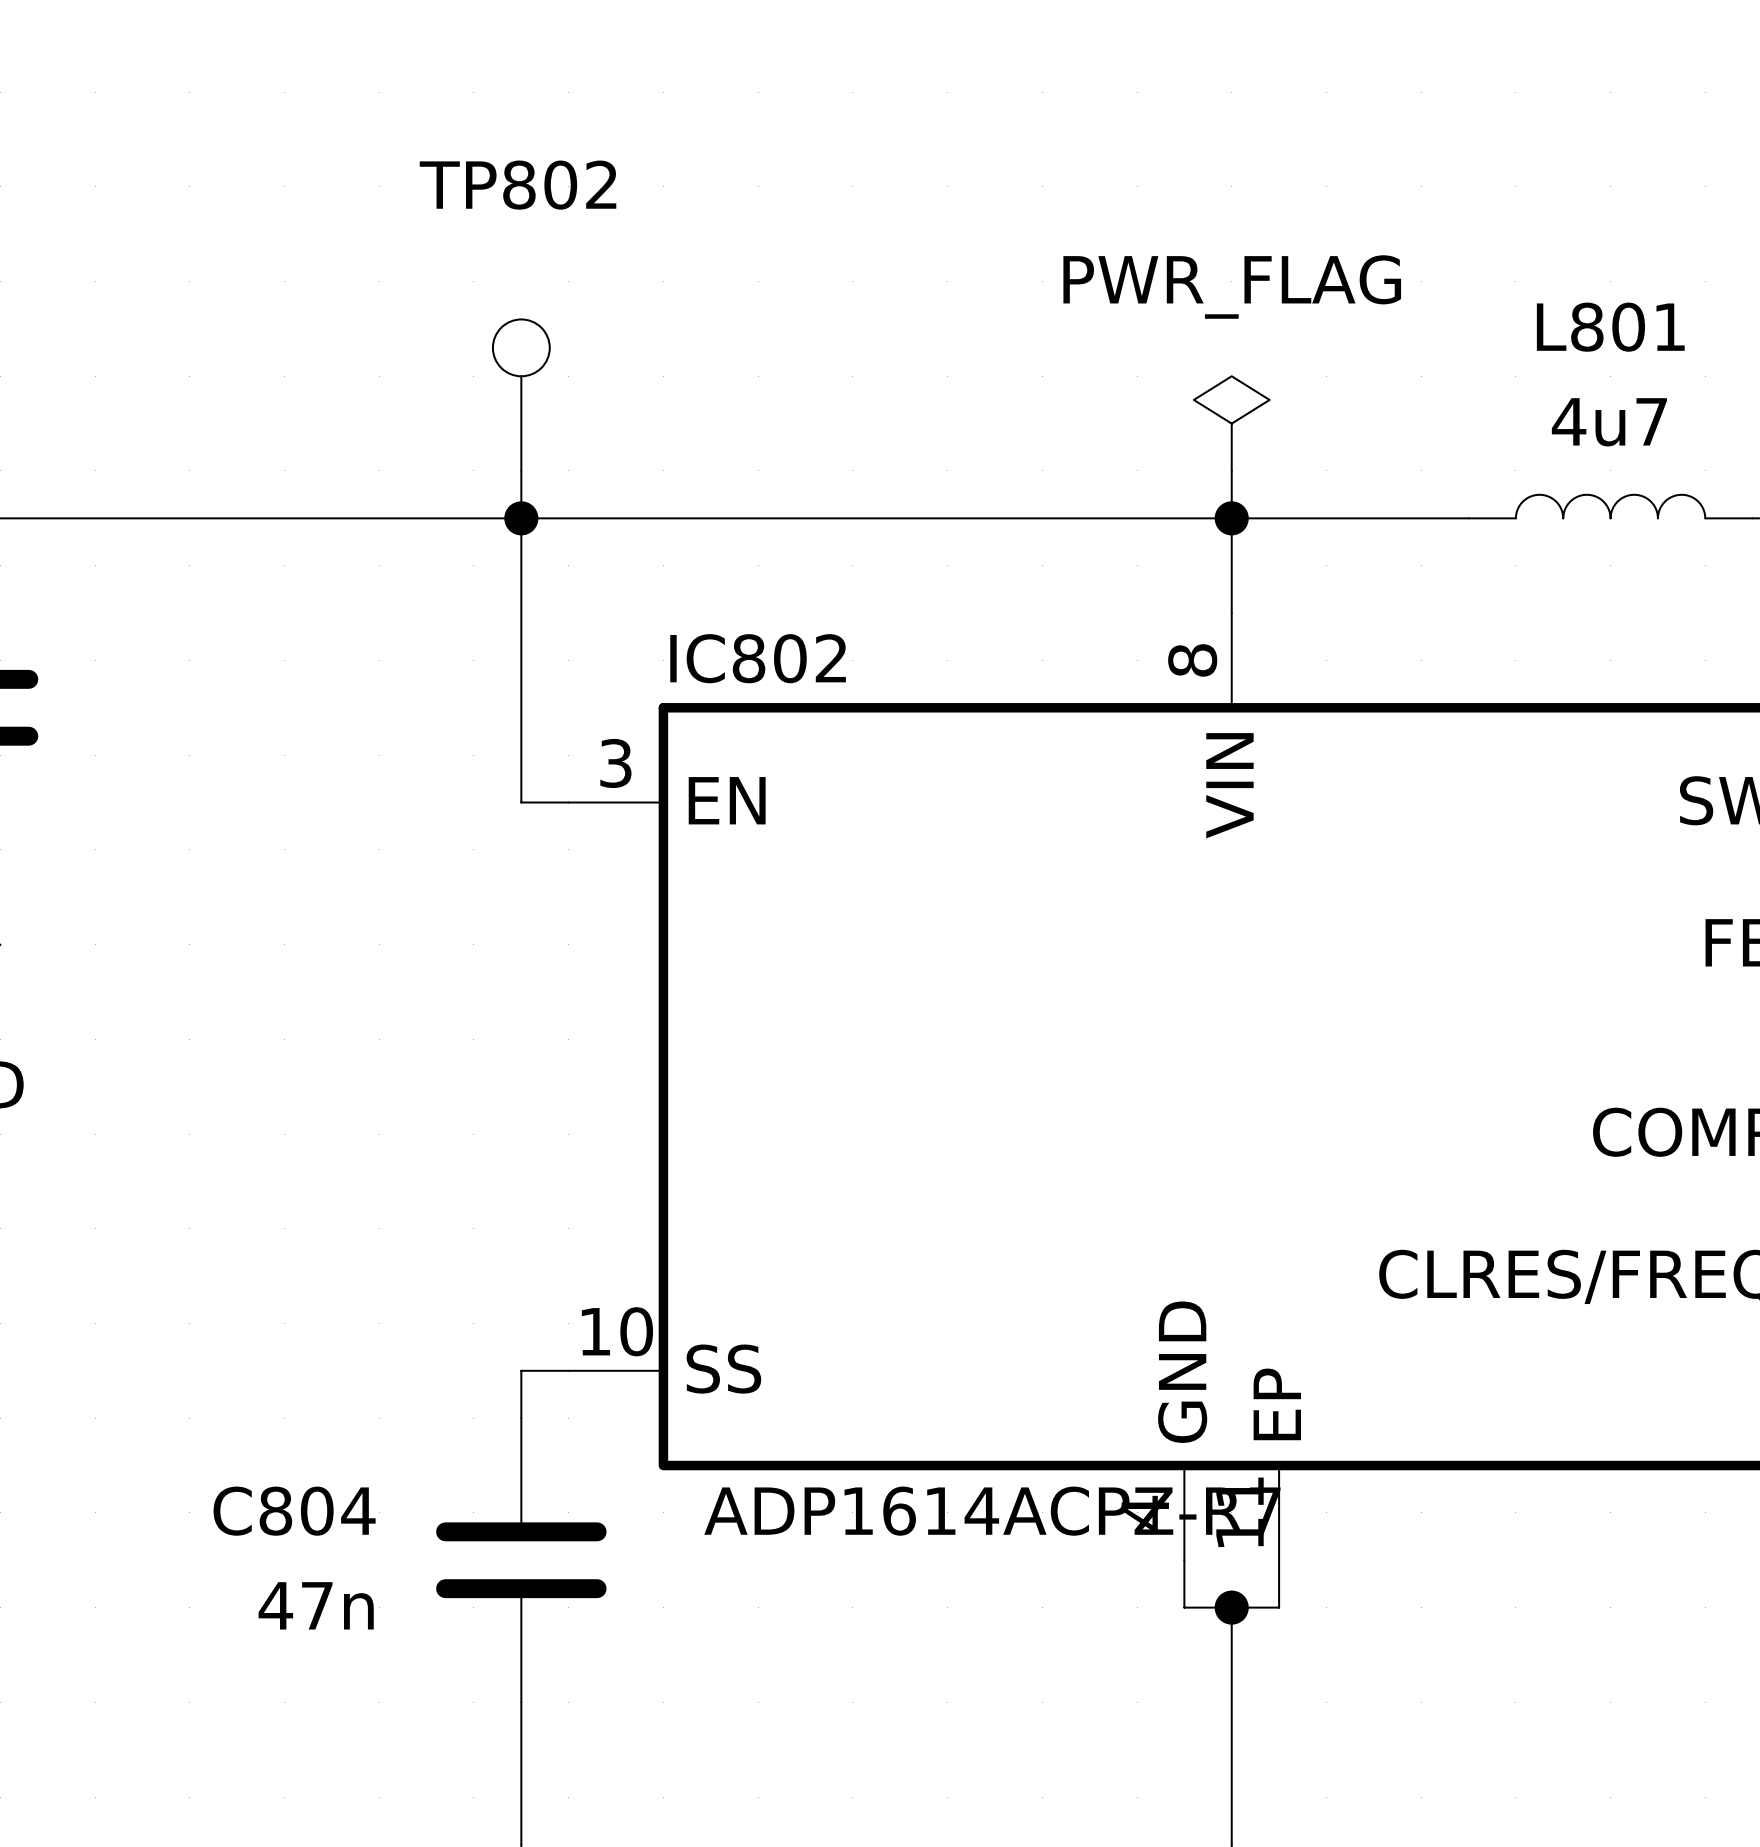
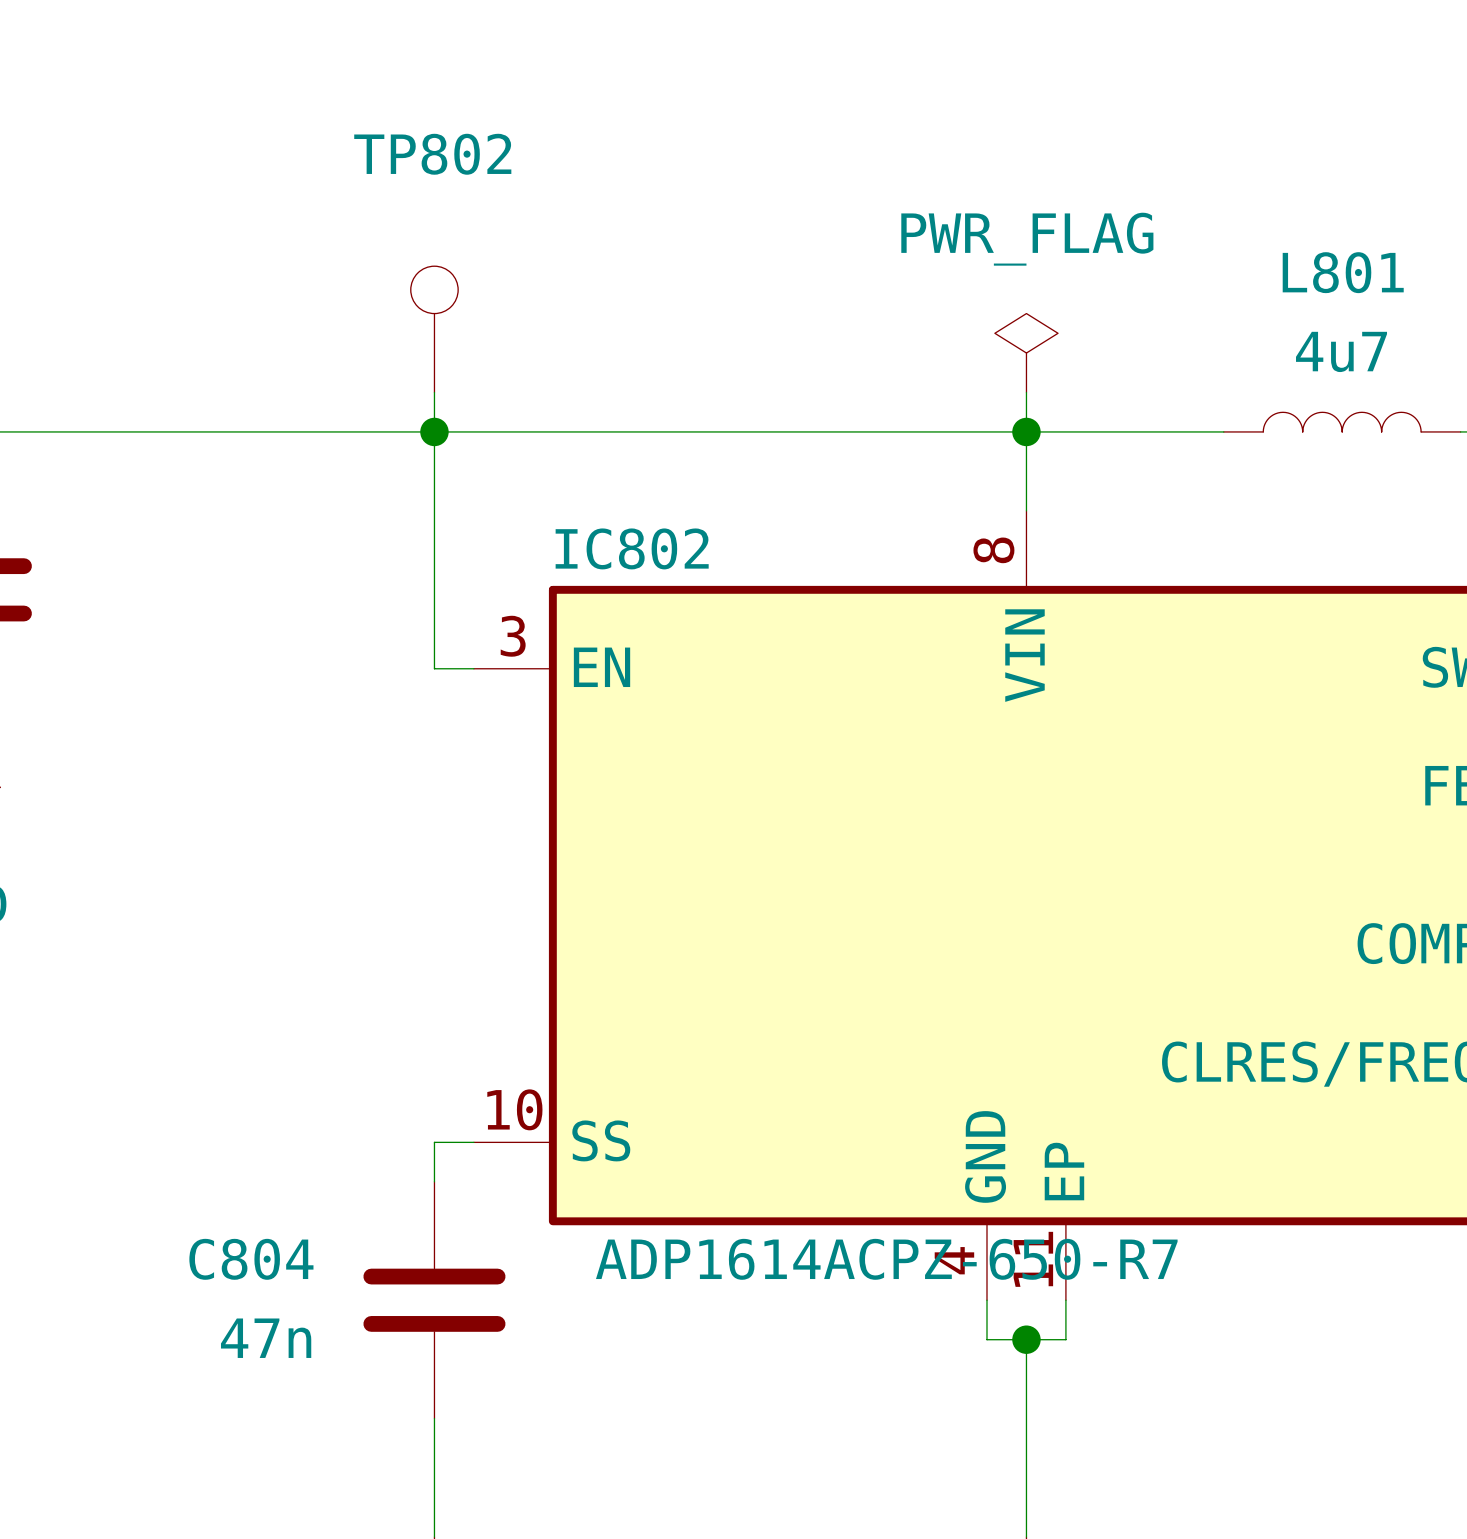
IC802 value: ADP1614ACPZ-R7 (992, 1511) -> ADP1614ACPZ-650-R7 (886, 1259)

